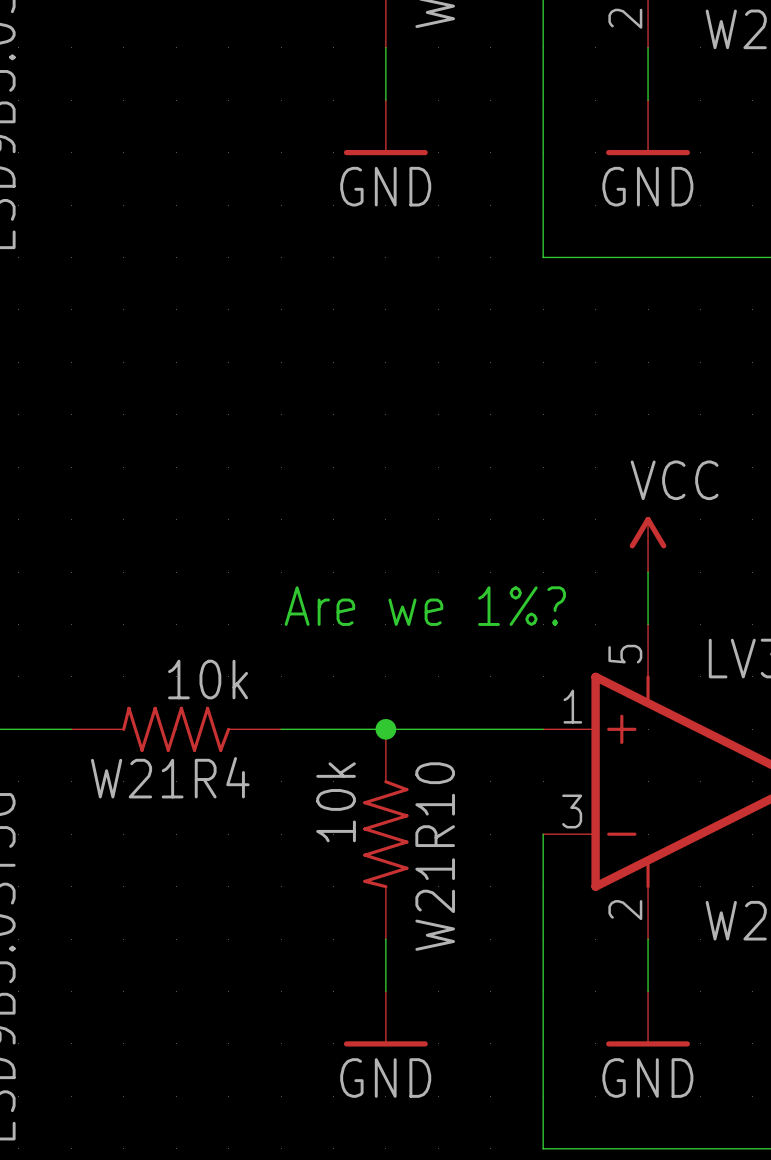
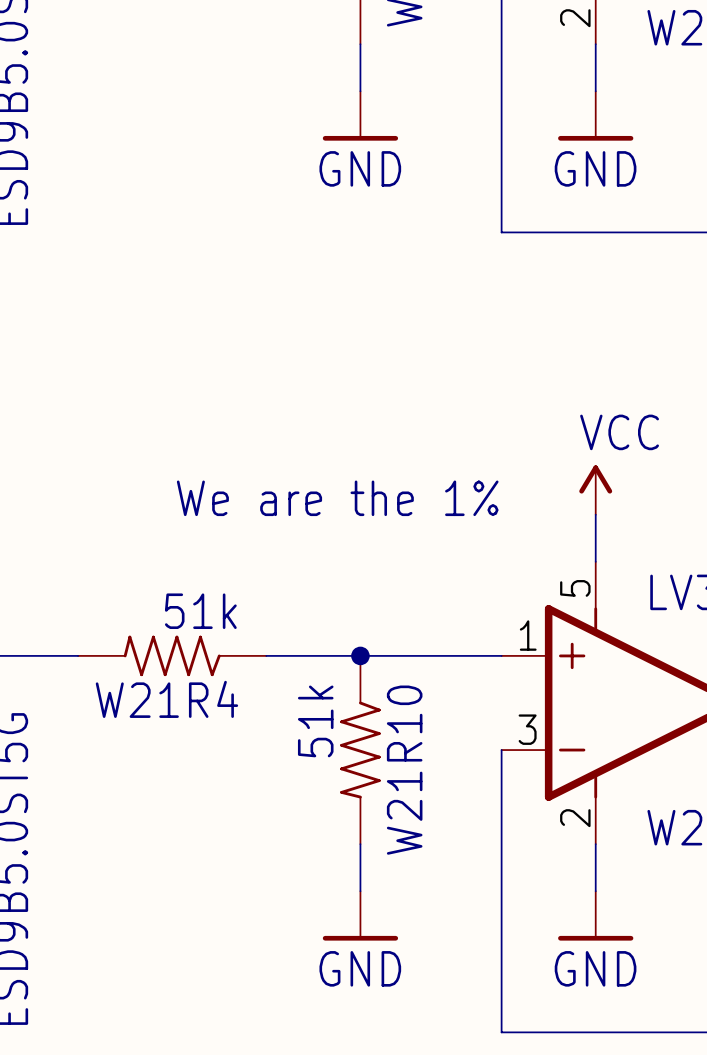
text: Are we 1%? (425, 606) -> We are the 1% (337, 498)
W21R4 value: 10k (208, 679) -> 51k (200, 611)
W21R10 value: 10k (336, 802) -> 51k (315, 721)

